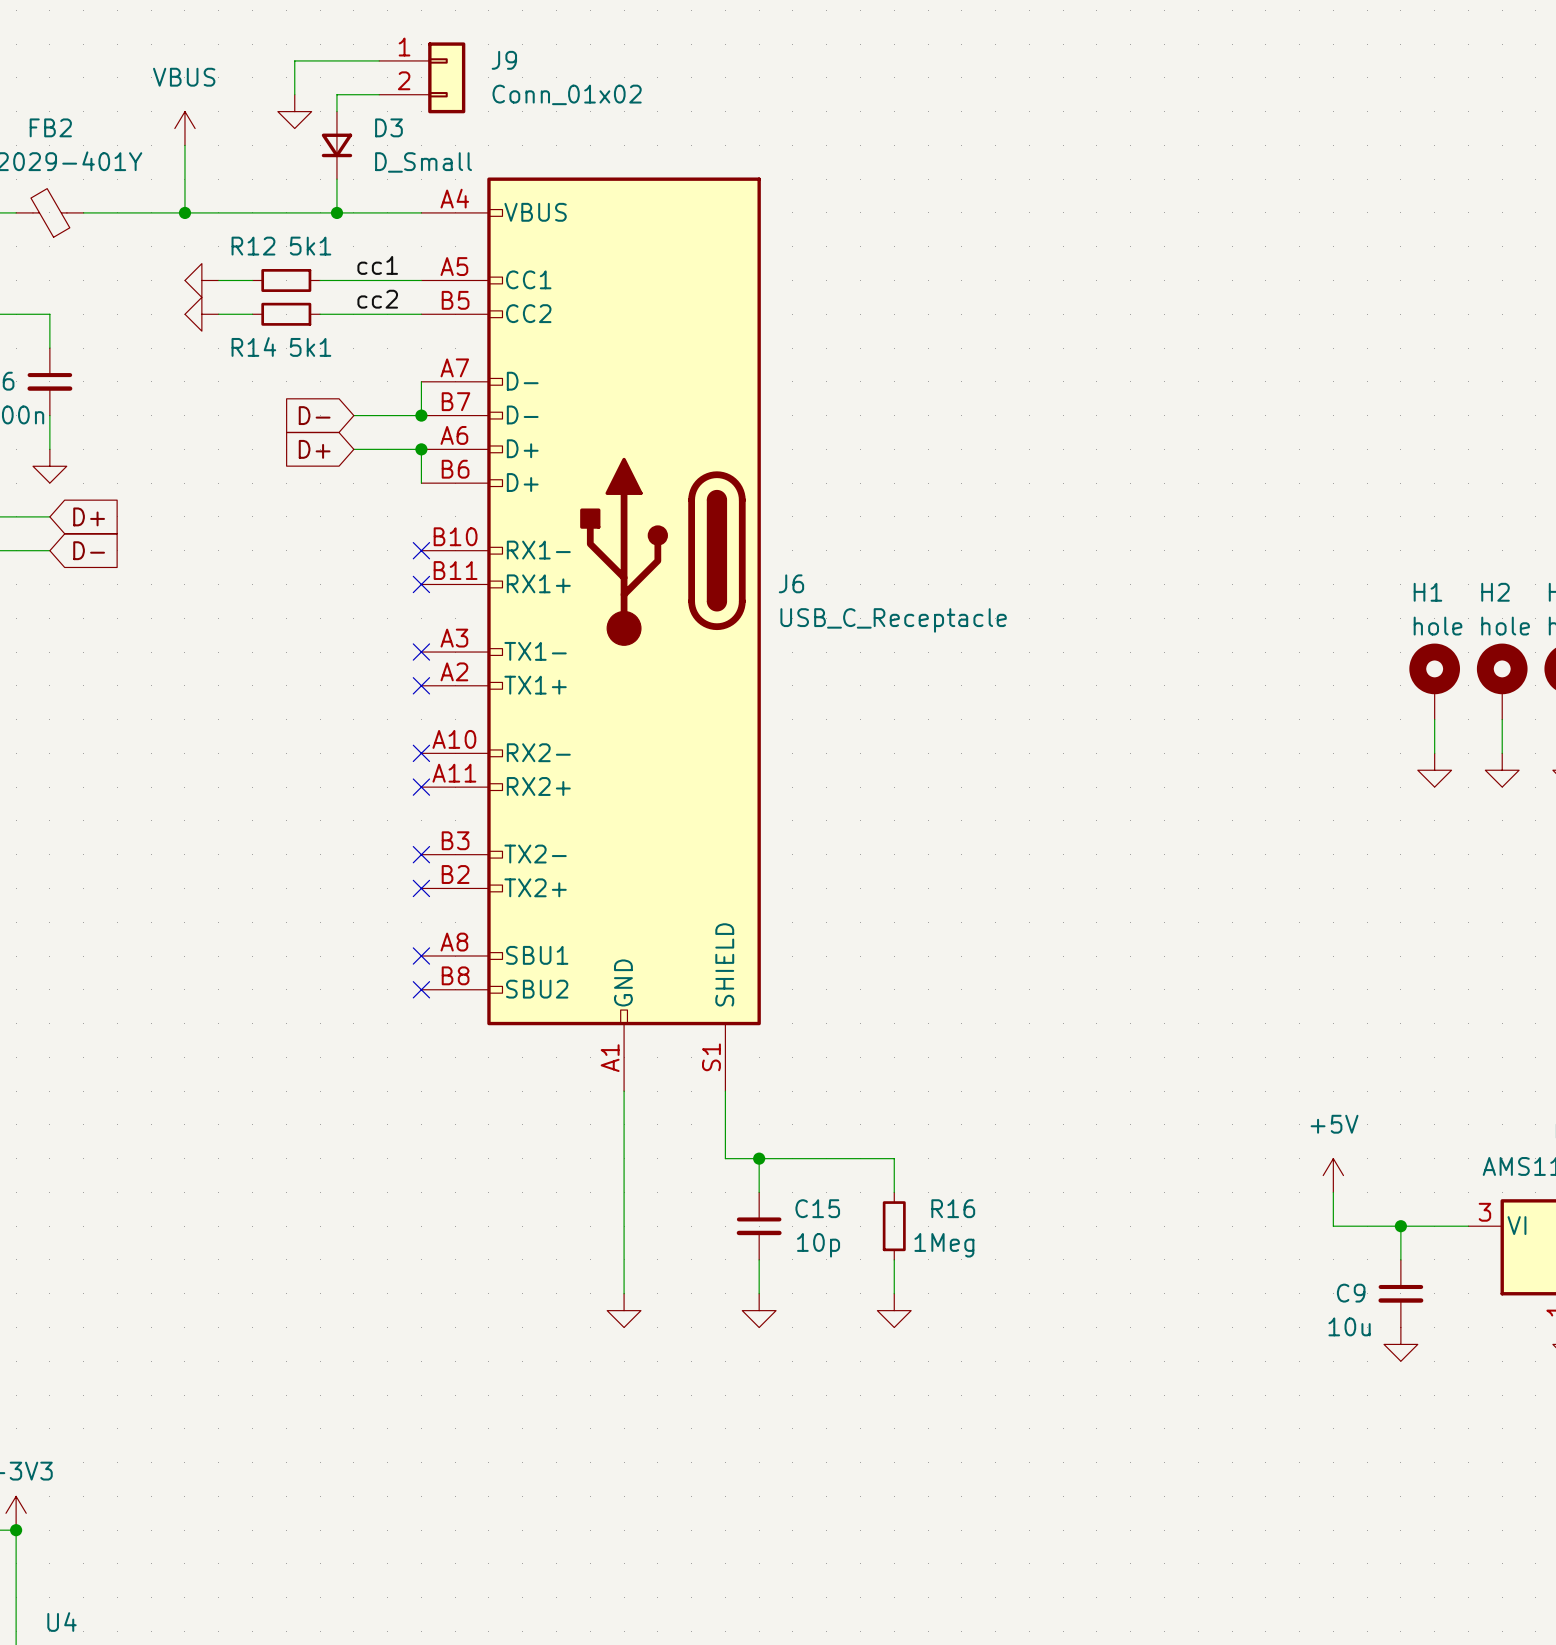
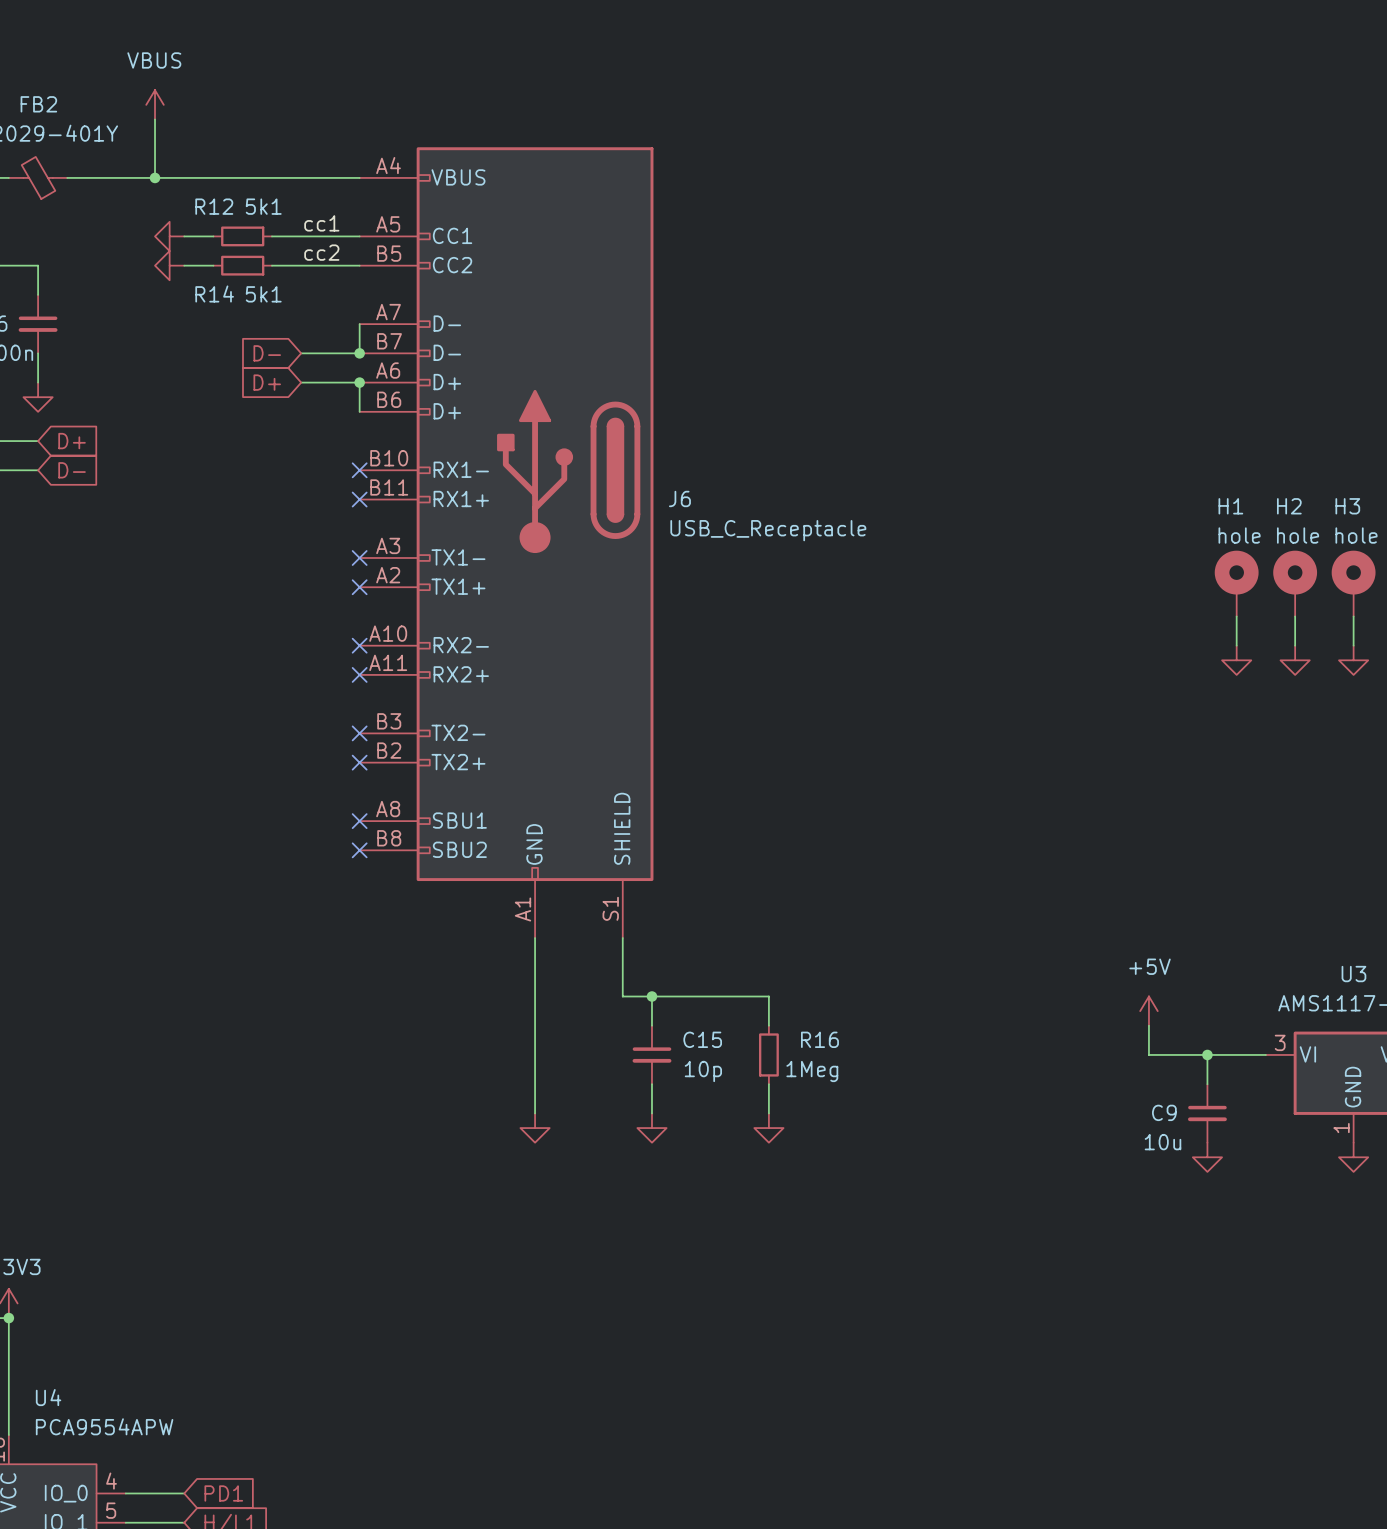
wire: (379, 60) (294, 60) (294, 94) -> none
J9: Conn_01x02 (422, 77) -> none
wire: (379, 94) (336, 94) (336, 111) -> none
power symbol: (294, 111) -> none
D3: D_Small (336, 145) -> none
wire: (336, 179) (336, 212) -> none
junction: (336, 212) -> none

